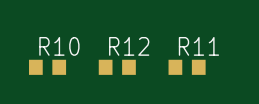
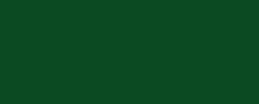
R10: (47, 67) -> none
R12: (117, 67) -> none
R11: (187, 67) -> none

